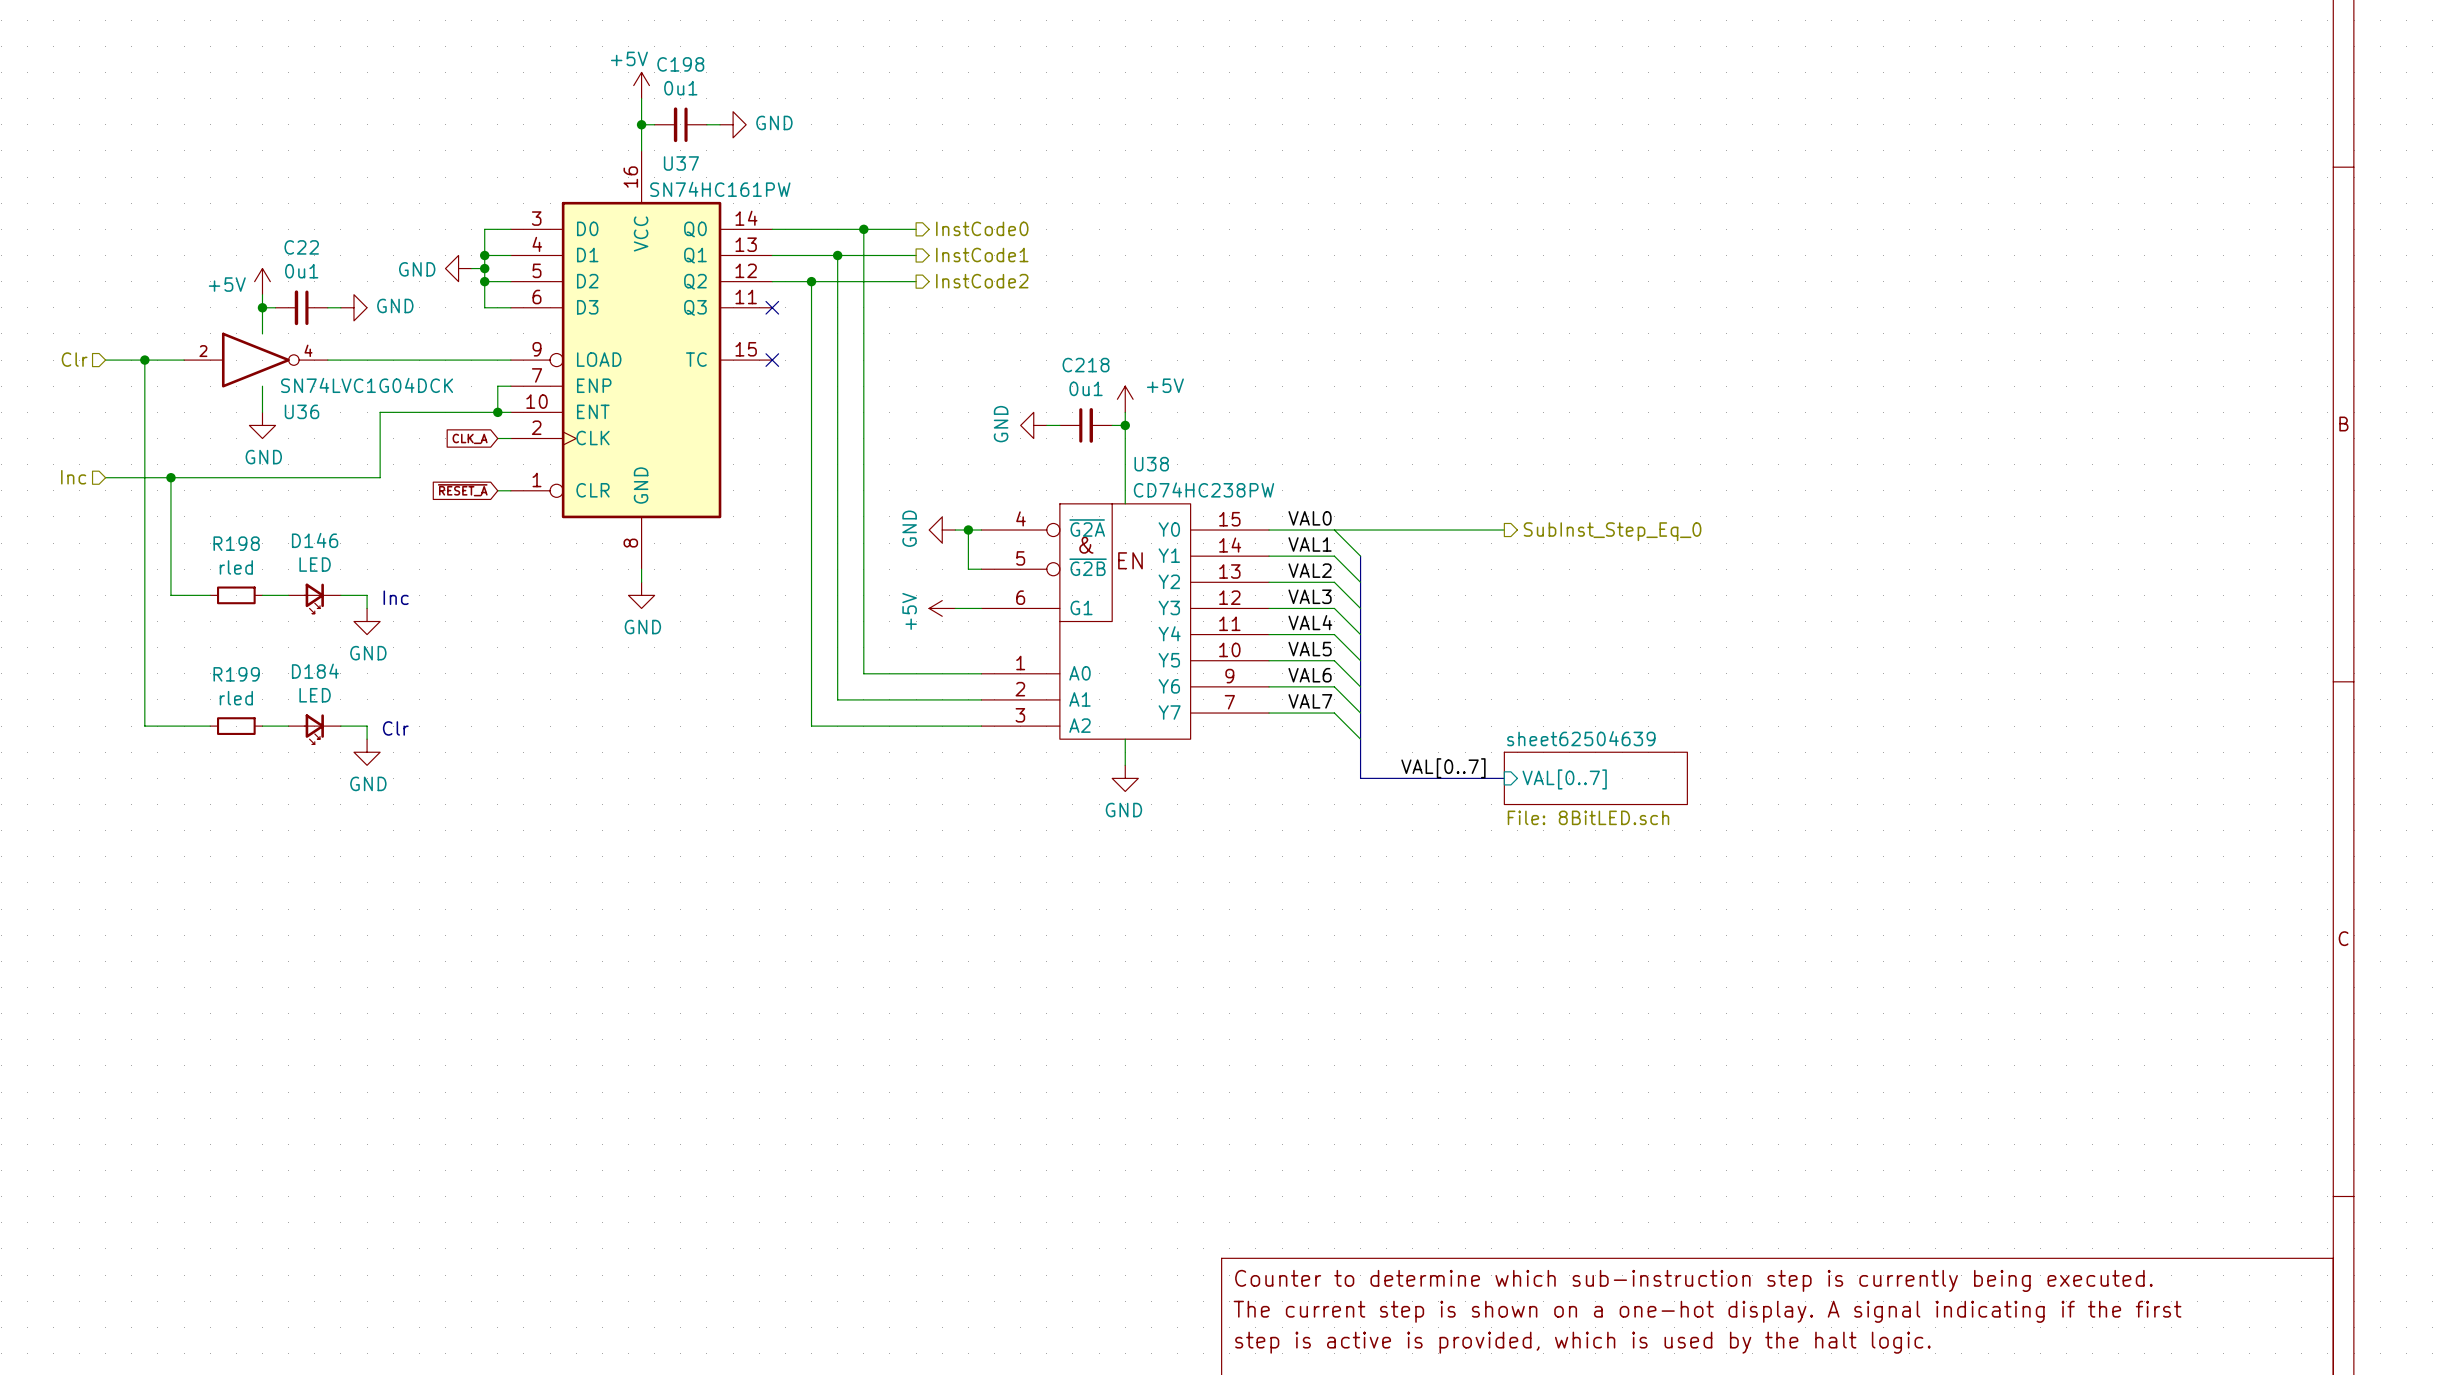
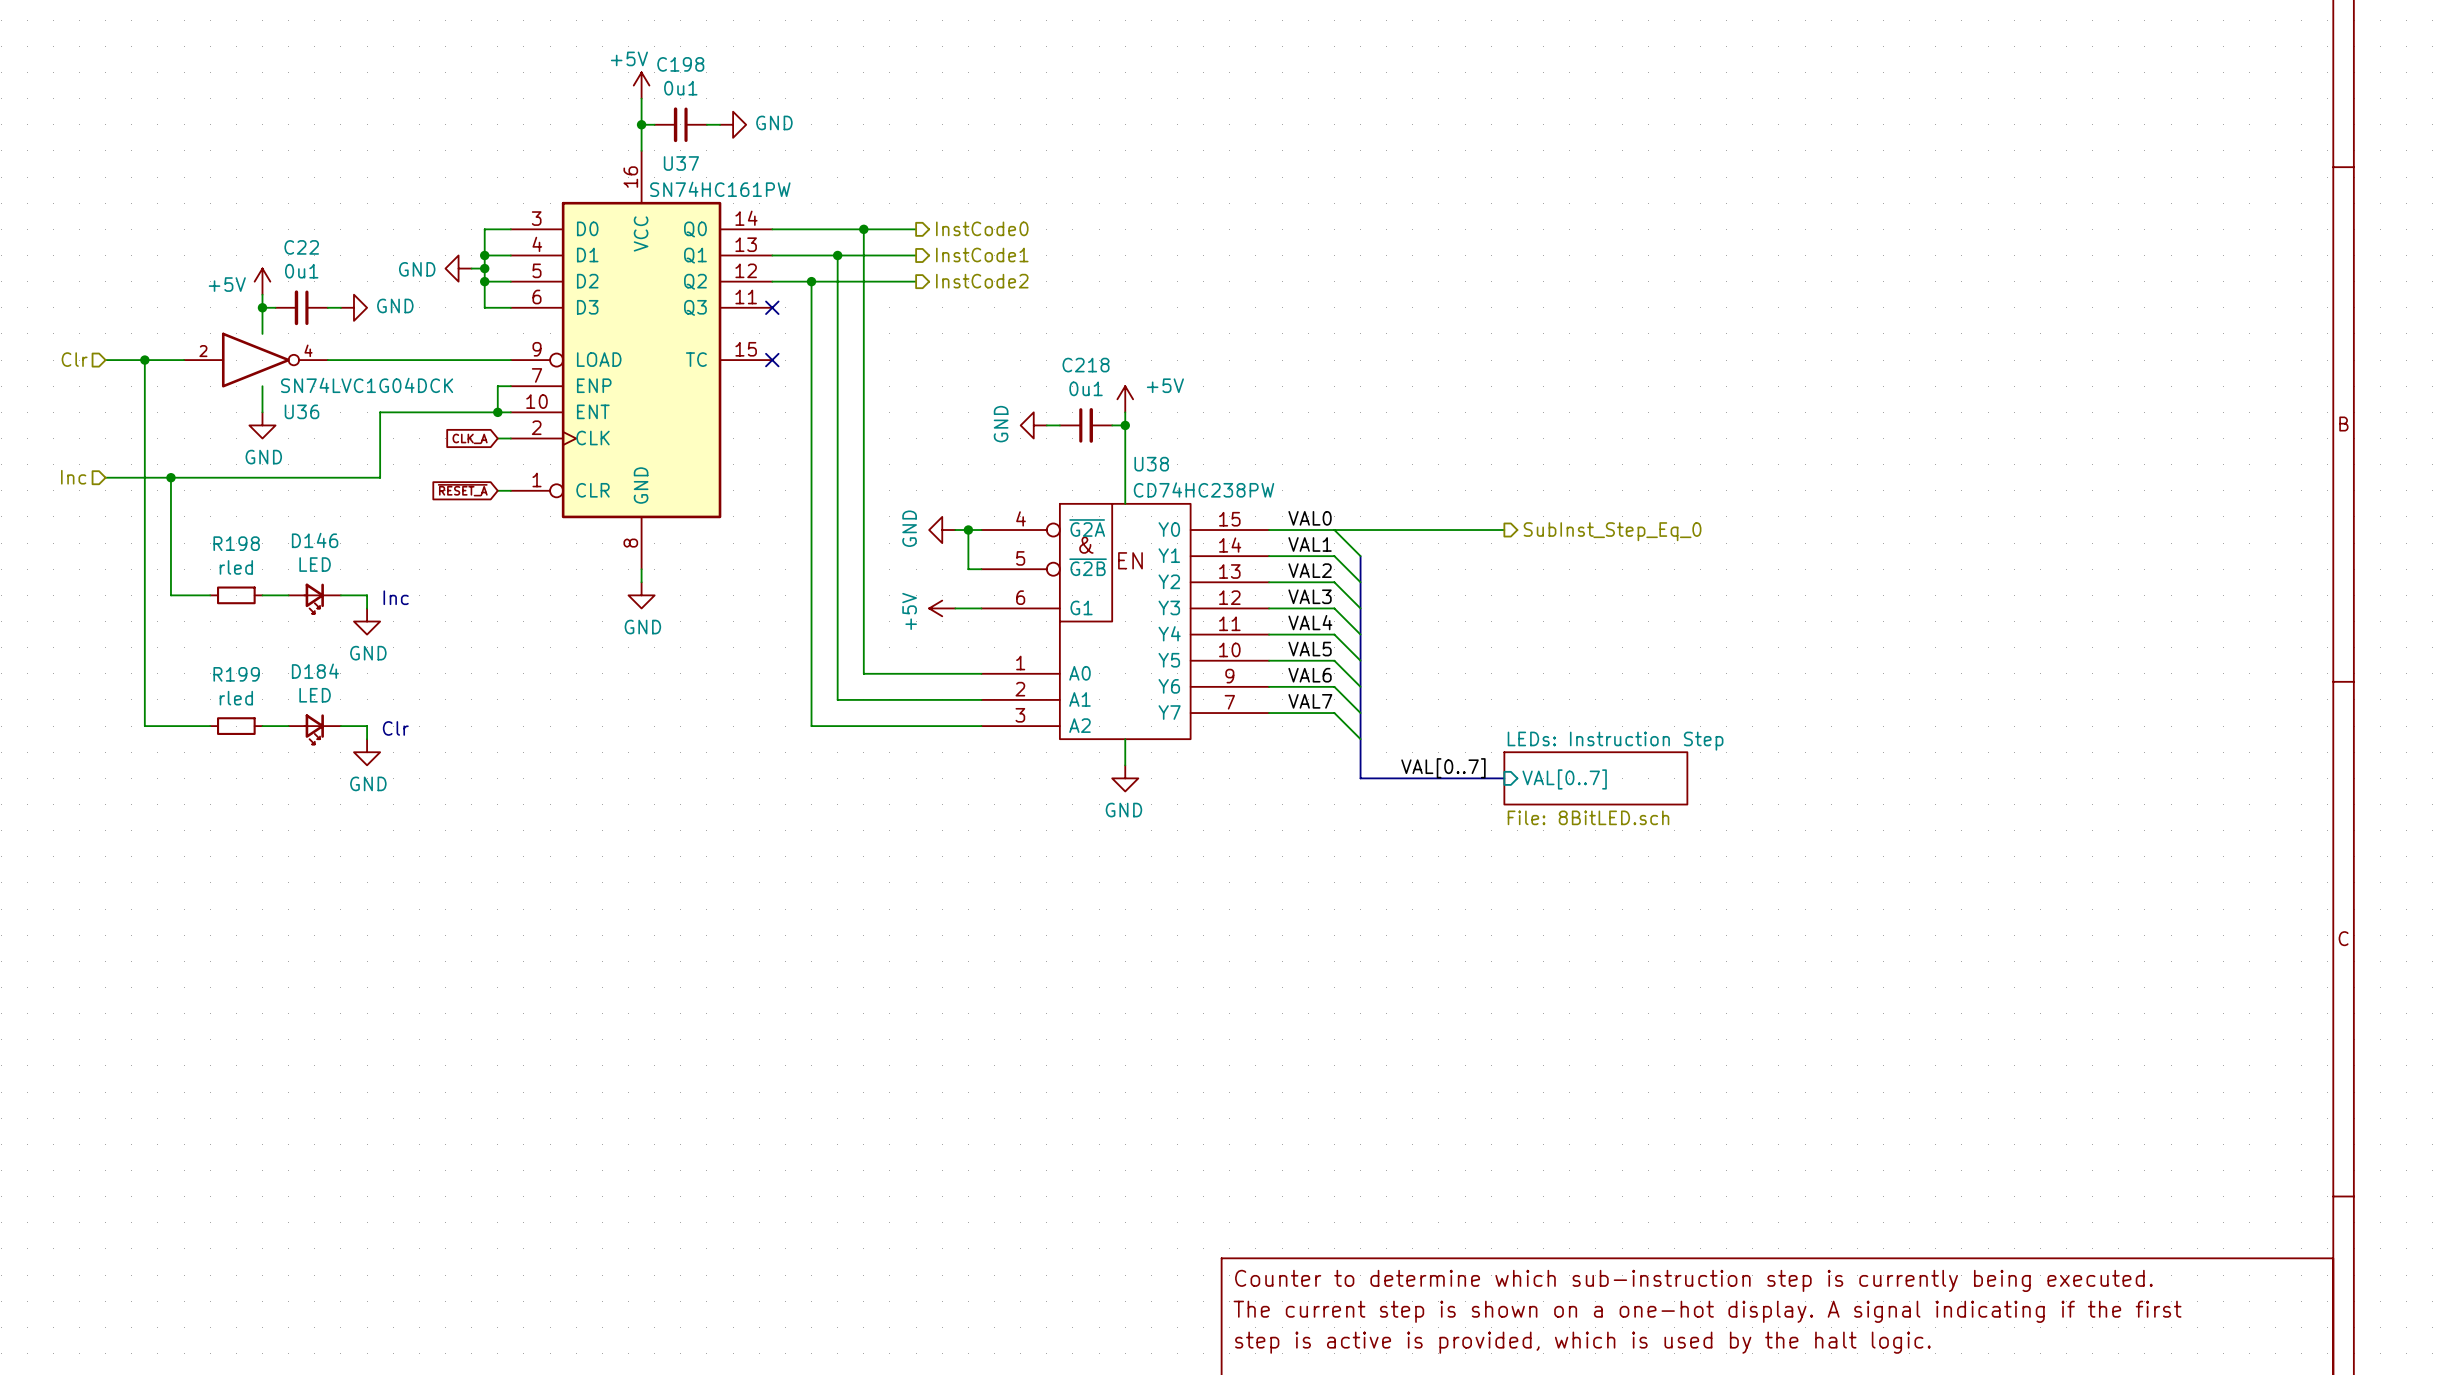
sheet sheet62504639 name: sheet62504639 (1581, 738) -> LEDs: Instruction Step (1615, 741)

